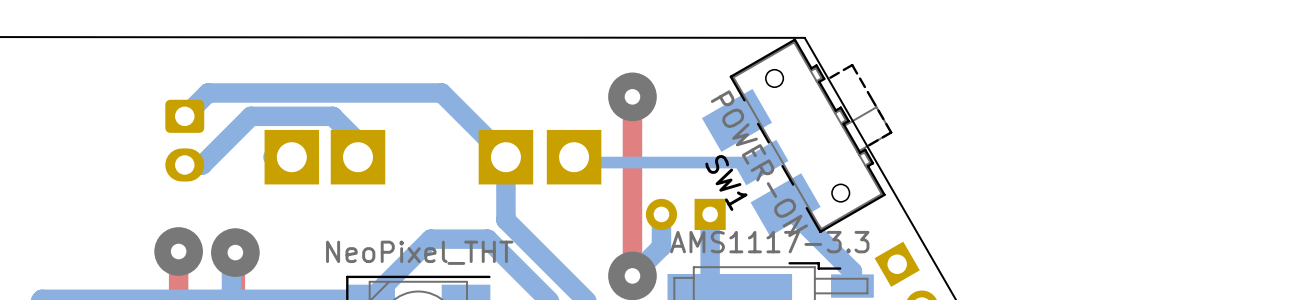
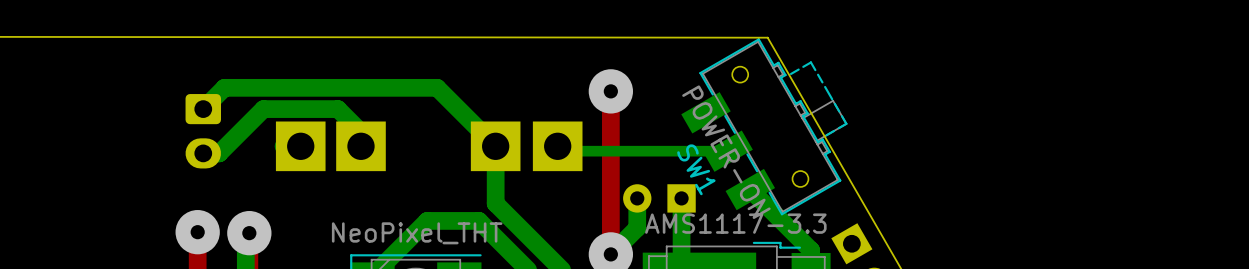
SW1 footprint: [701, 38, 893, 237] -> [681, 38, 848, 216]

